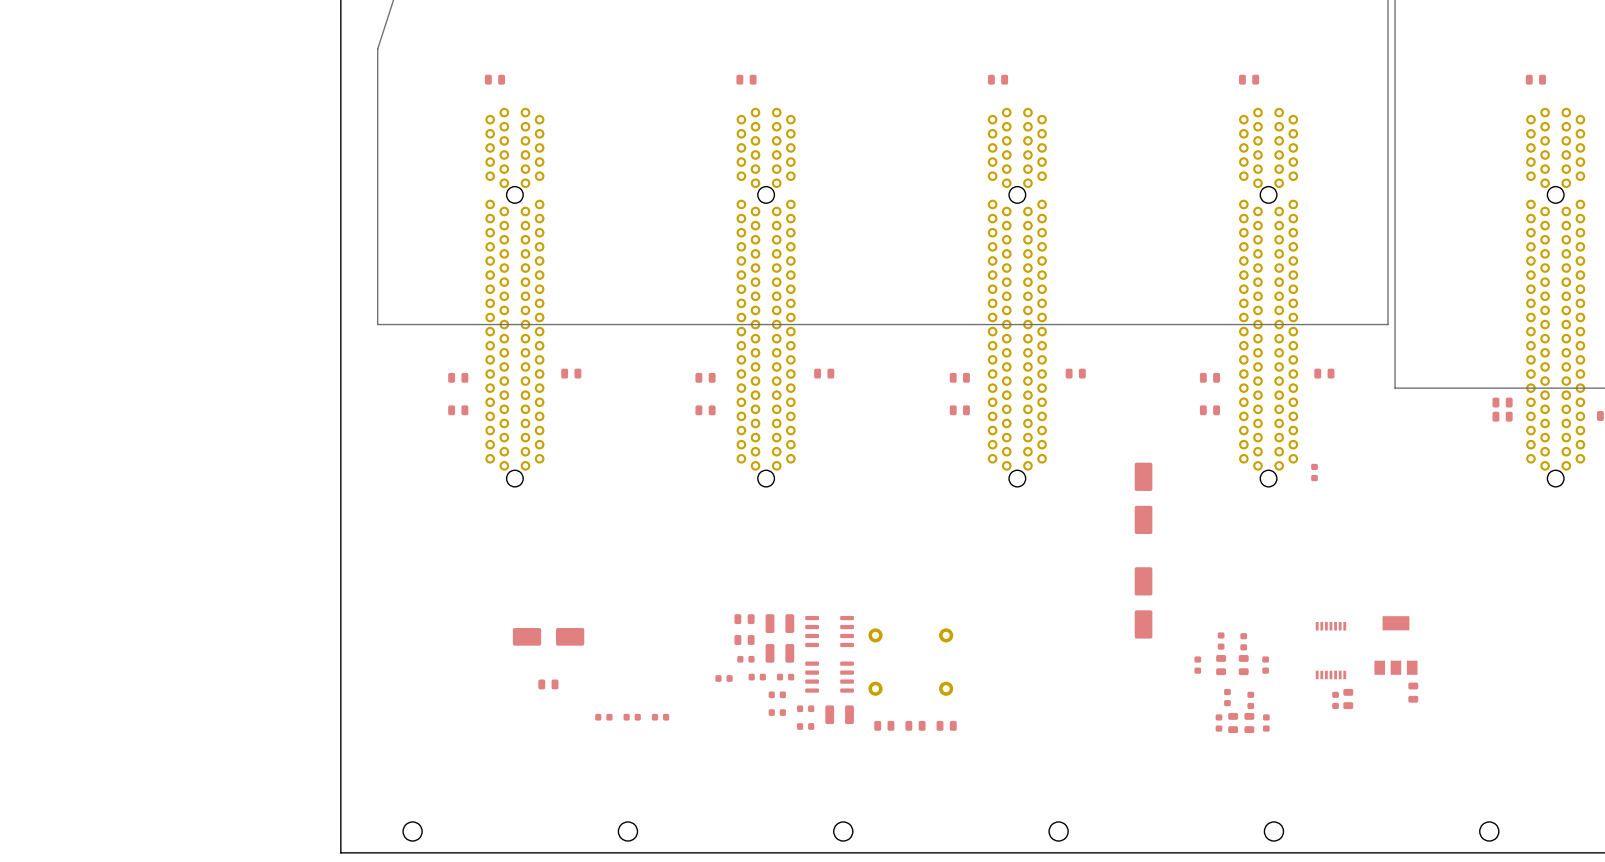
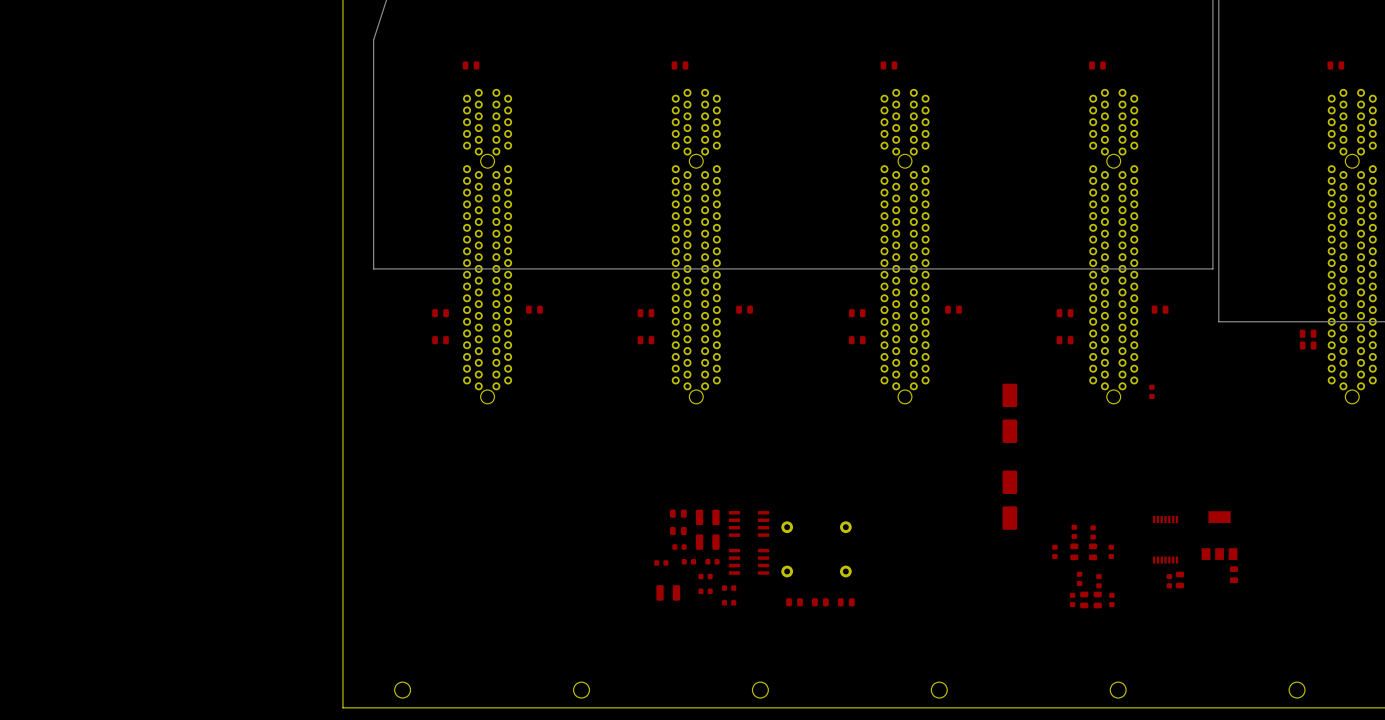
part: (548, 636) -> none
part: (548, 684) -> none
part position: (839, 714) -> (668, 592)
part: (603, 717) -> none
part: (632, 717) -> none
part: (660, 717) -> none

